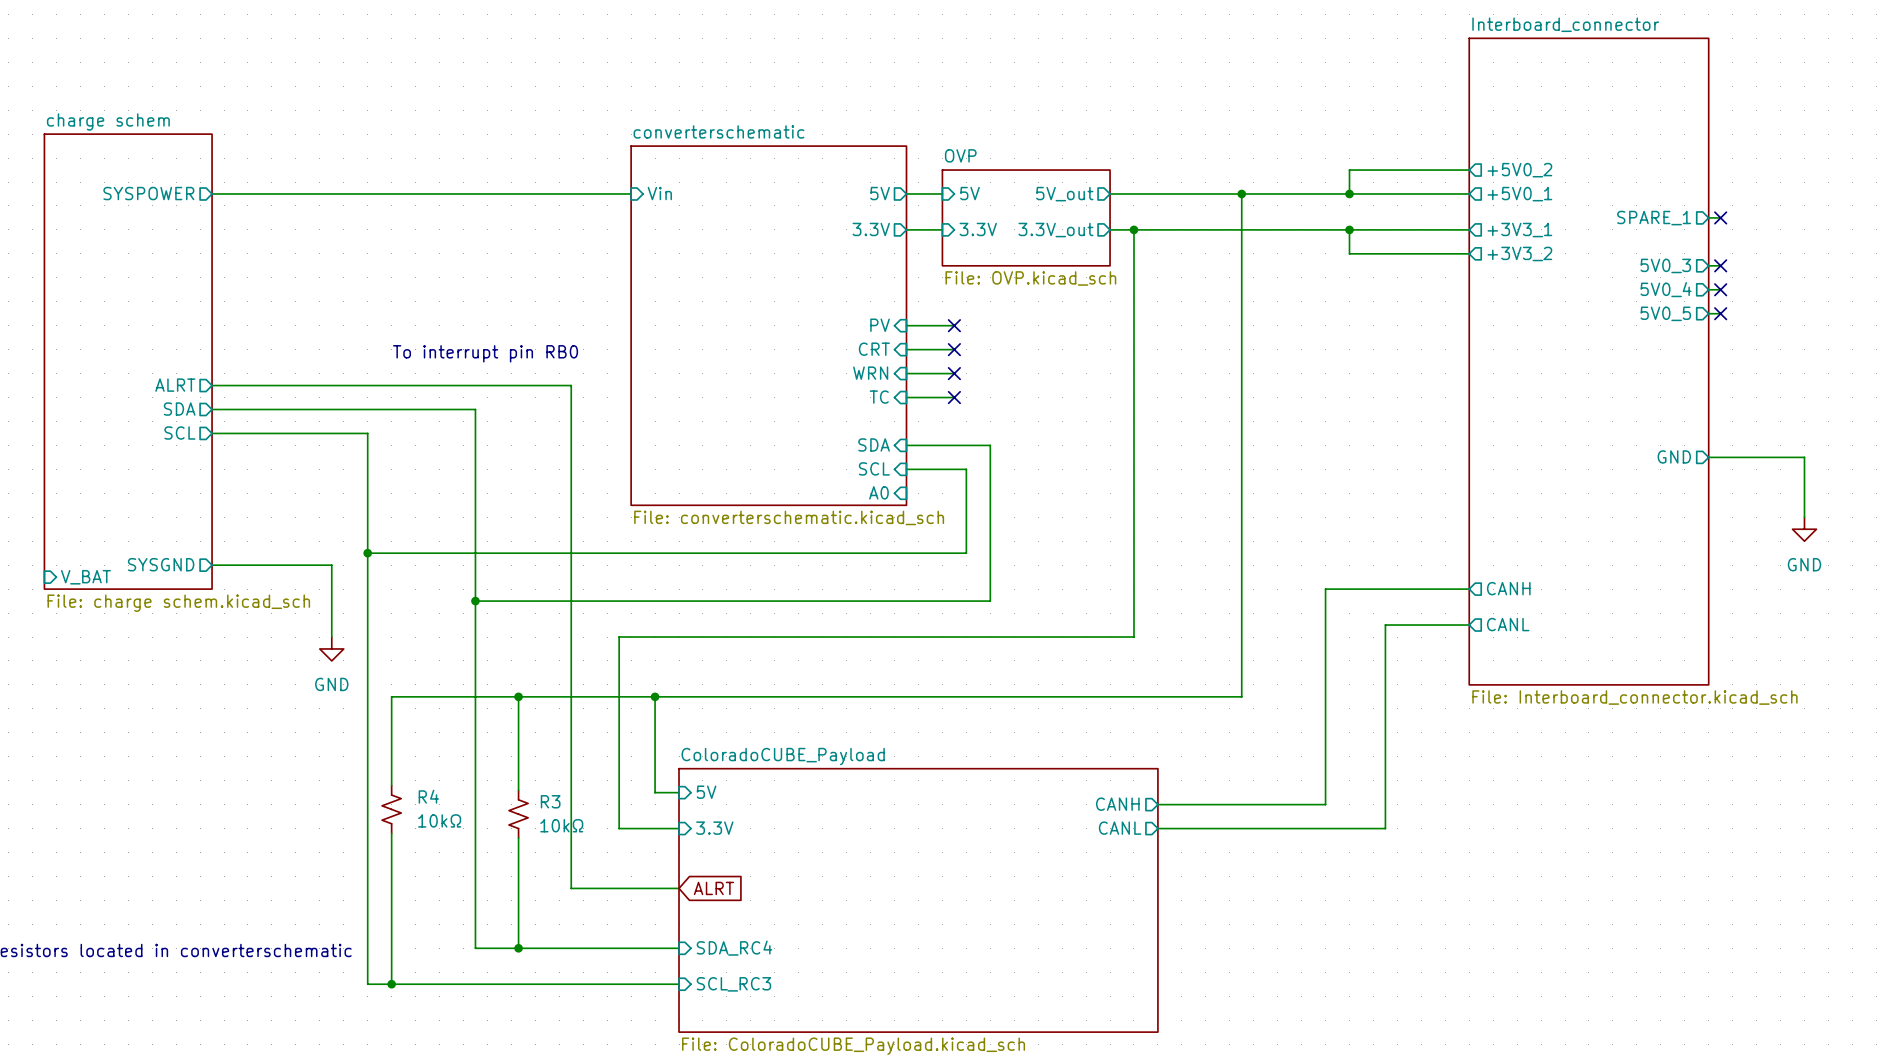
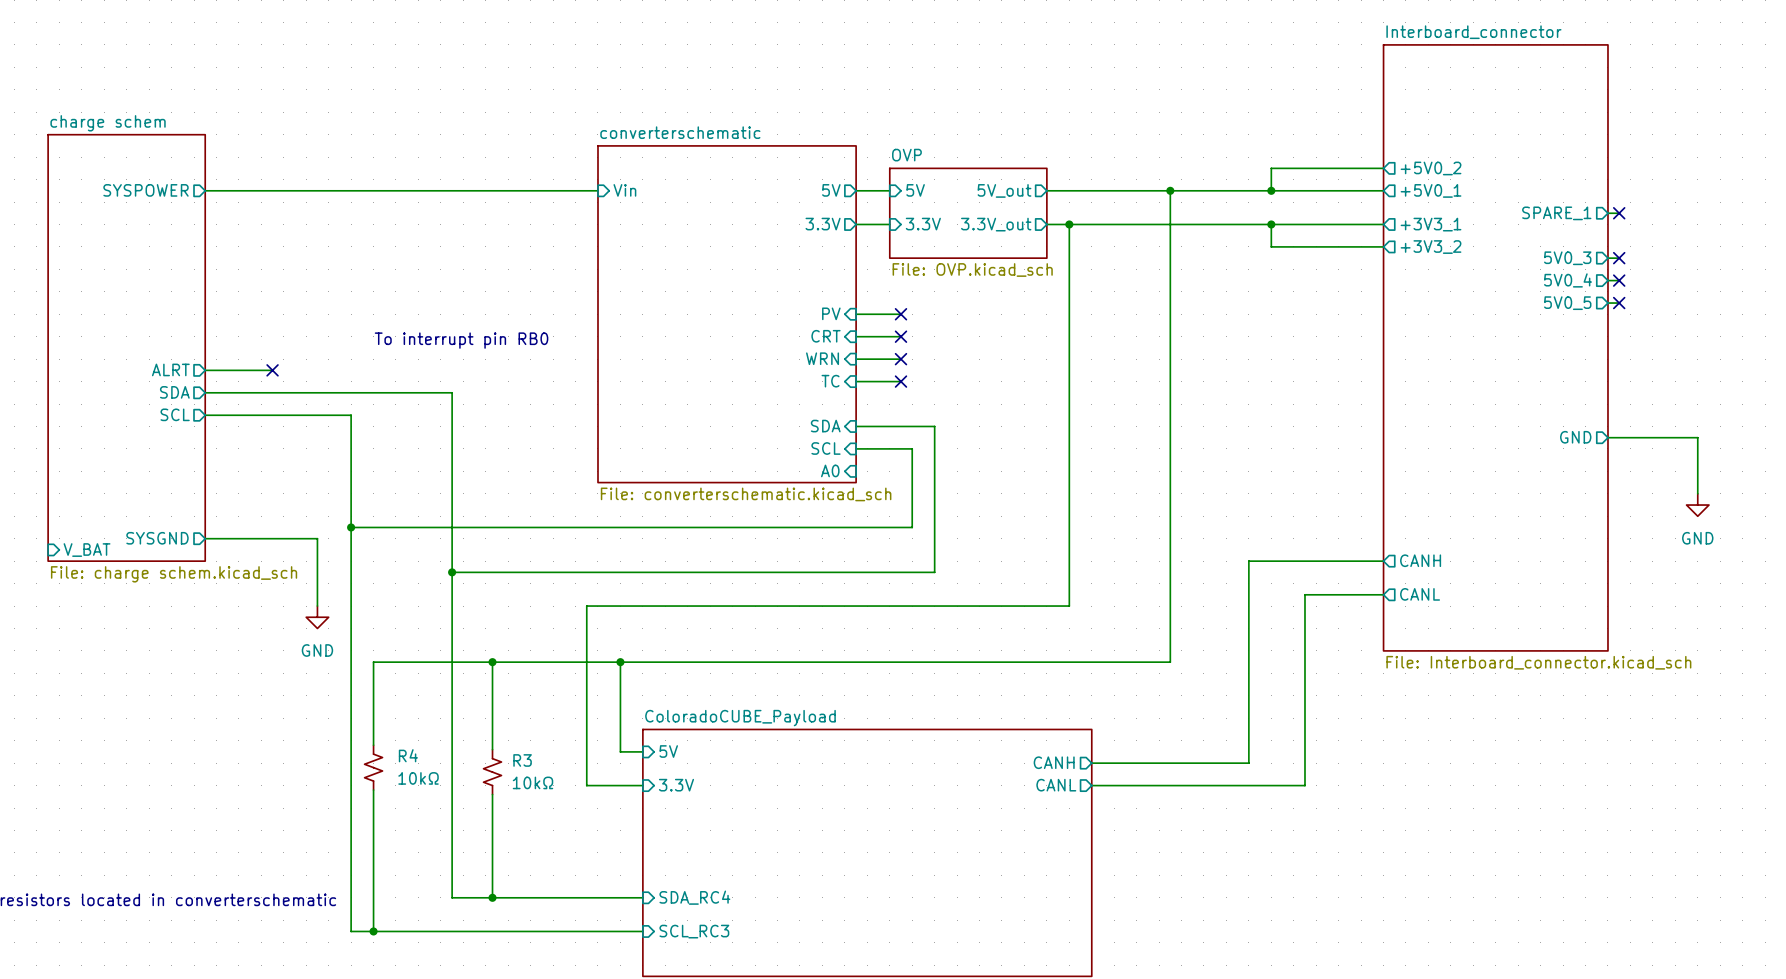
wire: (283, 385) (571, 385) (571, 888) (679, 888) -> none
no-connect mark: none -> (272, 370)
global label: ALRT (713, 888) -> none

